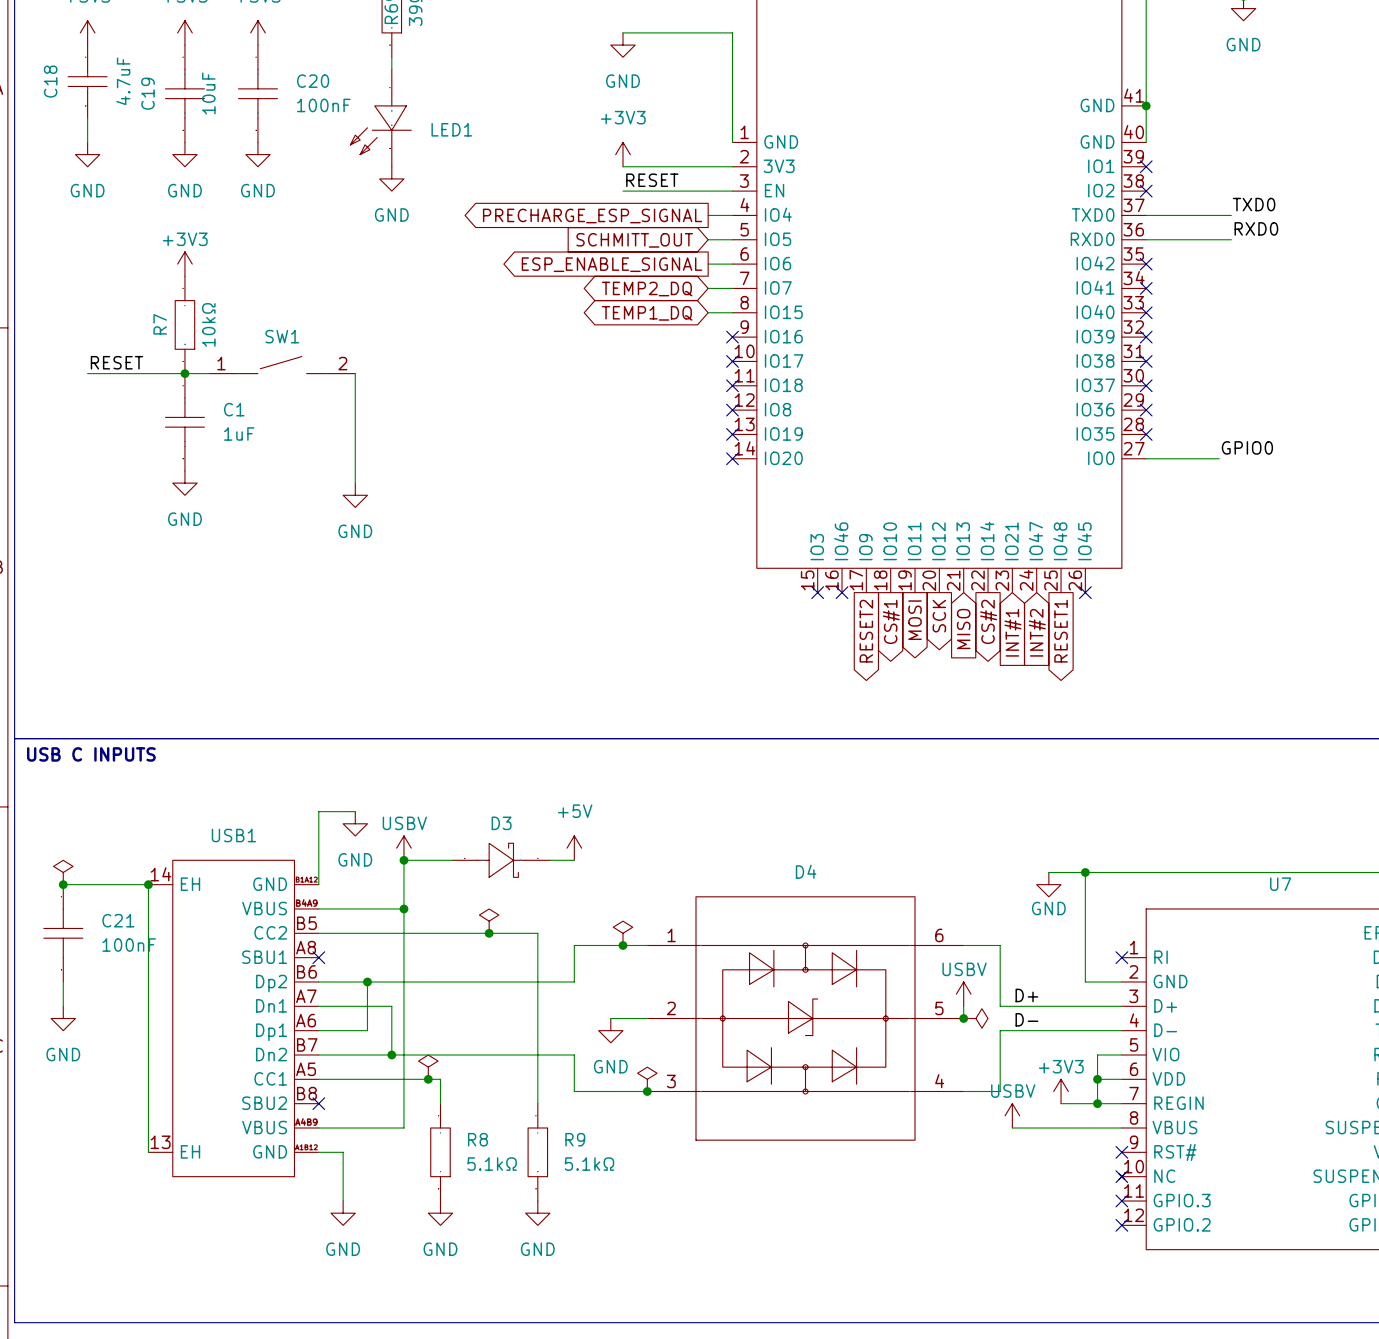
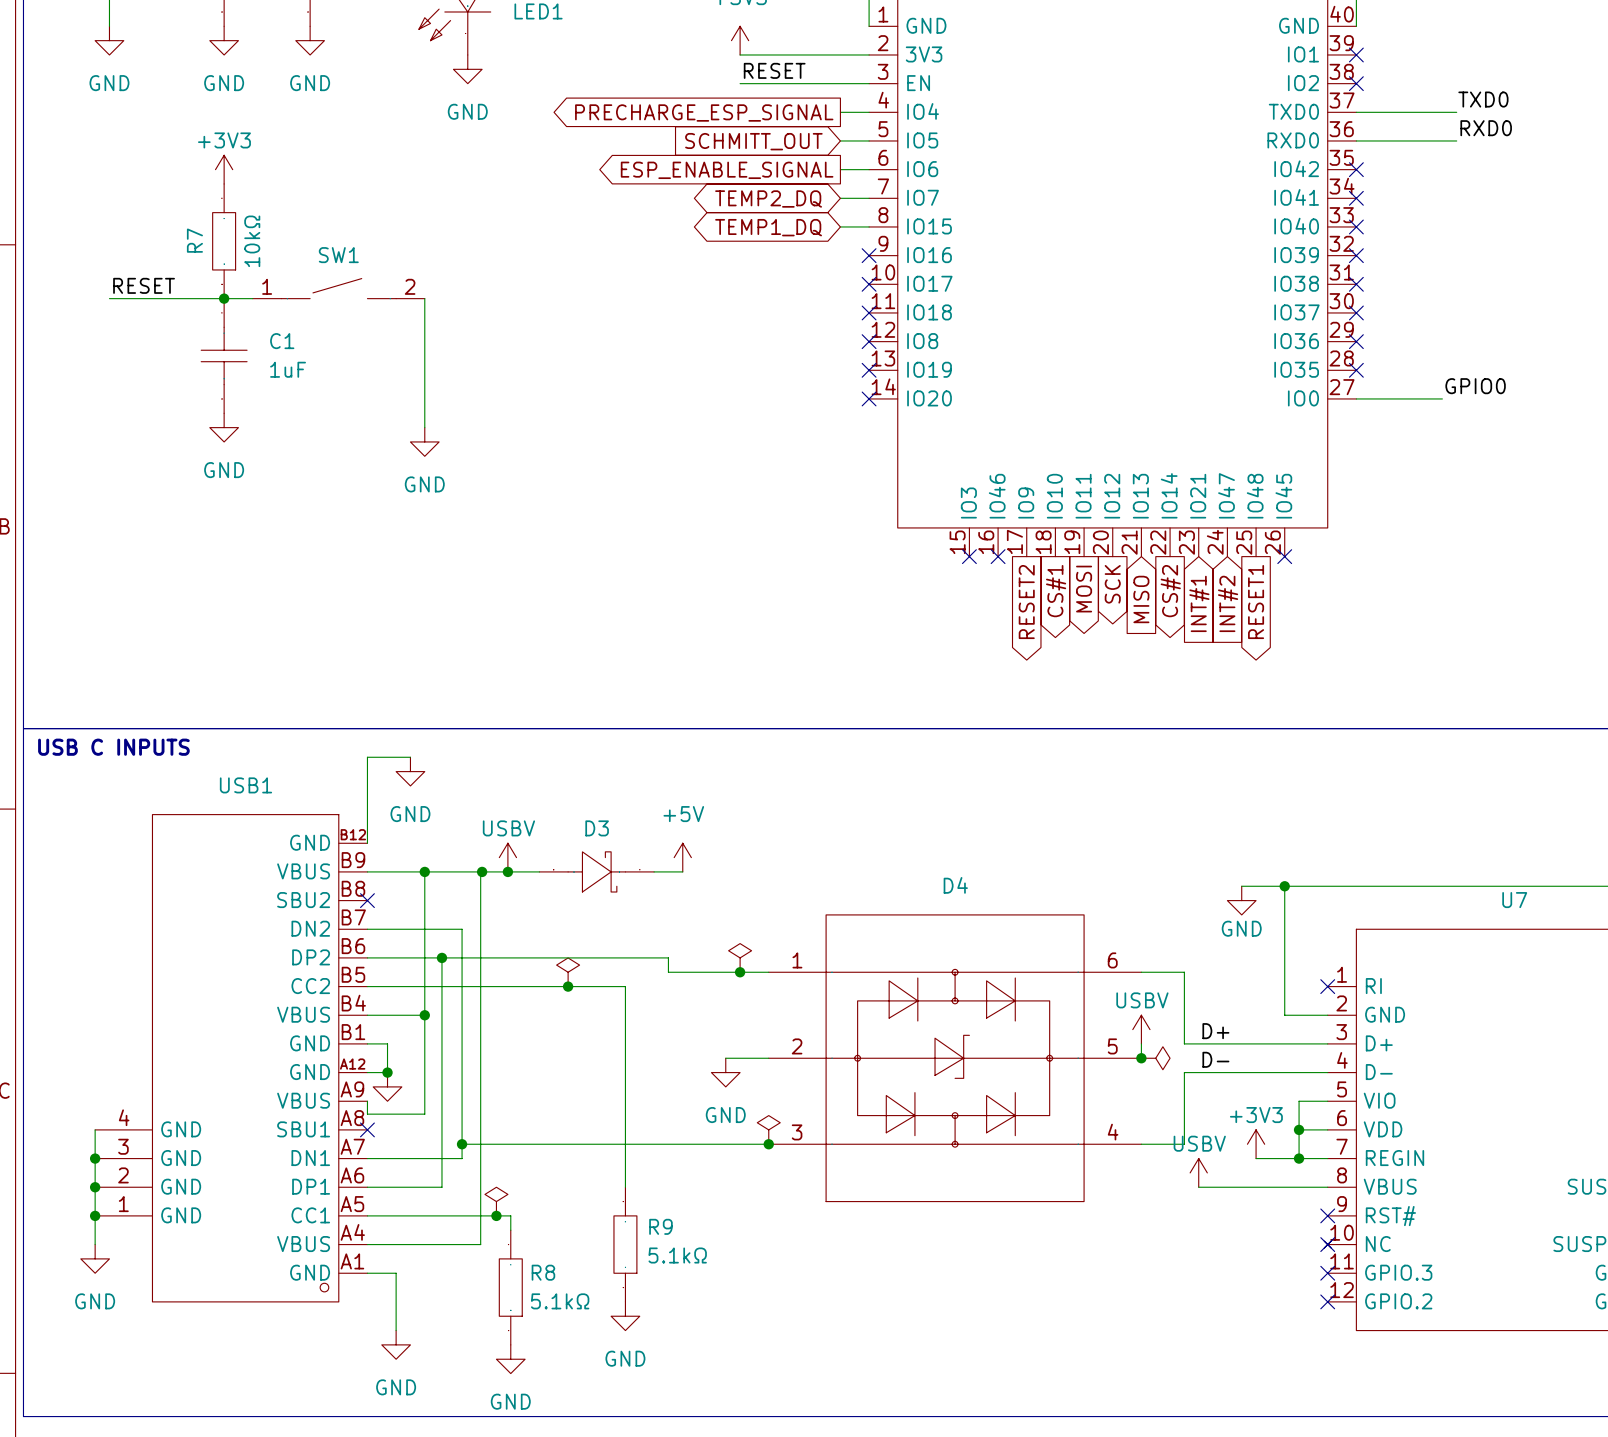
wire: (355, 811) (318, 811) (318, 884) -> (410, 757) (367, 757) (367, 843)
power symbol position: GND (355, 823) -> GND (410, 771)
USB1 name position: USB1 (233, 835) -> USB1 (245, 785)
power symbol position: USBV (403, 848) -> USBV (507, 857)
USB1 symbol: [148, 860, 319, 1177] -> [95, 814, 368, 1302]
wire: none -> (367, 871) (482, 871)
wire: none -> (424, 871) (424, 1114) (367, 1114) (367, 1101)
junction: none -> (424, 871)
wire: none -> (480, 871) (480, 1244) (367, 1244)
wire: (403, 860) (403, 1128) (369, 1128) -> (441, 957) (441, 1187)
junction: none -> (507, 871)
power symbol: (63, 872) -> none
wire: (63, 884) (148, 884) (148, 1152) -> none
junction: (63, 884) -> none
junction: (148, 884) -> none
no-connect mark: none -> (367, 900)
wire: (386, 908) (403, 908) -> (462, 929) (462, 1158) (367, 1158)
junction: (403, 908) -> none
power symbol position: (489, 921) -> (568, 972)
C21: 100nF (63, 933) -> none
junction: none -> (441, 957)
junction position: (489, 933) -> (568, 986)
wire: (537, 933) (537, 1103) -> (639, 957) (668, 957) (668, 972) (682, 972)
wire: (574, 945) (574, 981) (355, 981) -> none
wire: none -> (367, 986) (625, 986) (625, 1187)
no-connect mark: (318, 957) -> none
wire: (63, 981) (63, 1006) -> none
wire: (367, 981) (367, 1030) (323, 1030) -> (387, 1043) (387, 1072)
junction position: (367, 981) -> (424, 1015)
wire: (323, 1006) (391, 1006) (391, 1054) -> none
power symbol: GND (63, 1018) -> none
junction: none -> (387, 1072)
power symbol: none -> (387, 1086)
wire: (318, 1054) (574, 1054) (574, 1091) -> (462, 1144) (682, 1144)
junction: (391, 1054) -> none
power symbol: (428, 1067) -> none
wire: none -> (95, 1129) (95, 1244)
wire: (318, 1079) (440, 1079) (440, 1103) -> none
junction: (428, 1079) -> none
junction: none -> (462, 1144)
junction: none -> (95, 1158)
no-connect mark position: (318, 1103) -> (367, 1129)
junction: none -> (95, 1187)
R8 name position: R8 (477, 1139) -> R8 (543, 1272)
R9 name position: R9 (575, 1139) -> R9 (660, 1226)
power symbol: none -> (496, 1201)
junction: none -> (95, 1215)
wire: (343, 1152) (343, 1201) -> (410, 1215) (510, 1215) (510, 1230)
junction: none -> (496, 1215)
R8 position: (440, 1152) -> (510, 1287)
R9 position: (537, 1152) -> (625, 1244)
R8 value position: 5.1kΩ (492, 1164) -> 5.1kΩ (560, 1301)
R9 value position: 5.1kΩ (589, 1164) -> 5.1kΩ (677, 1255)
power symbol: none -> GND (95, 1258)
wire: none -> (367, 1273) (396, 1273) (396, 1330)
power symbol position: GND (343, 1213) -> GND (396, 1344)
power symbol: GND (440, 1213) -> none
power symbol position: GND (537, 1213) -> GND (625, 1316)
power symbol: none -> GND (510, 1359)

